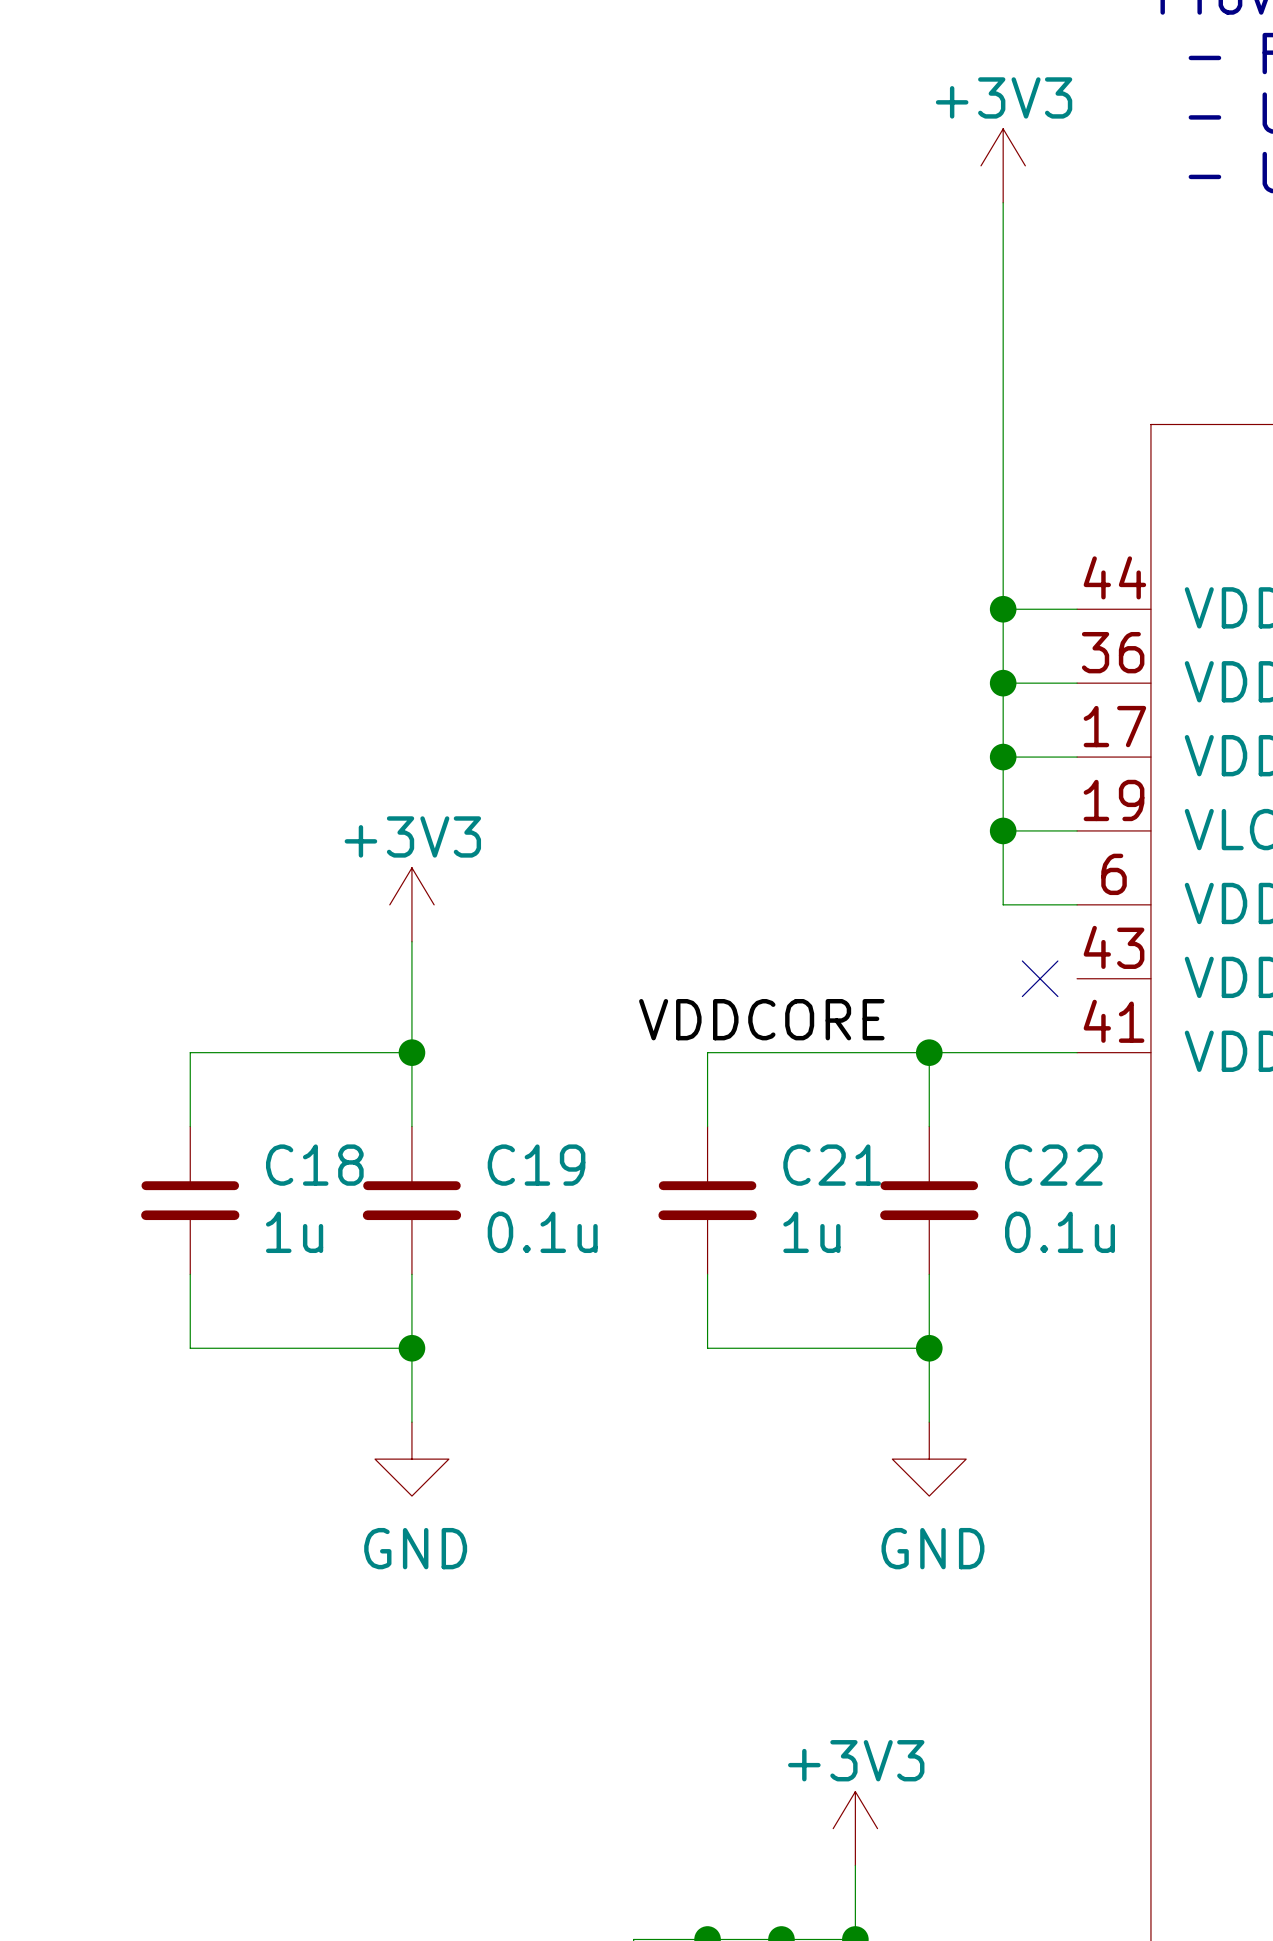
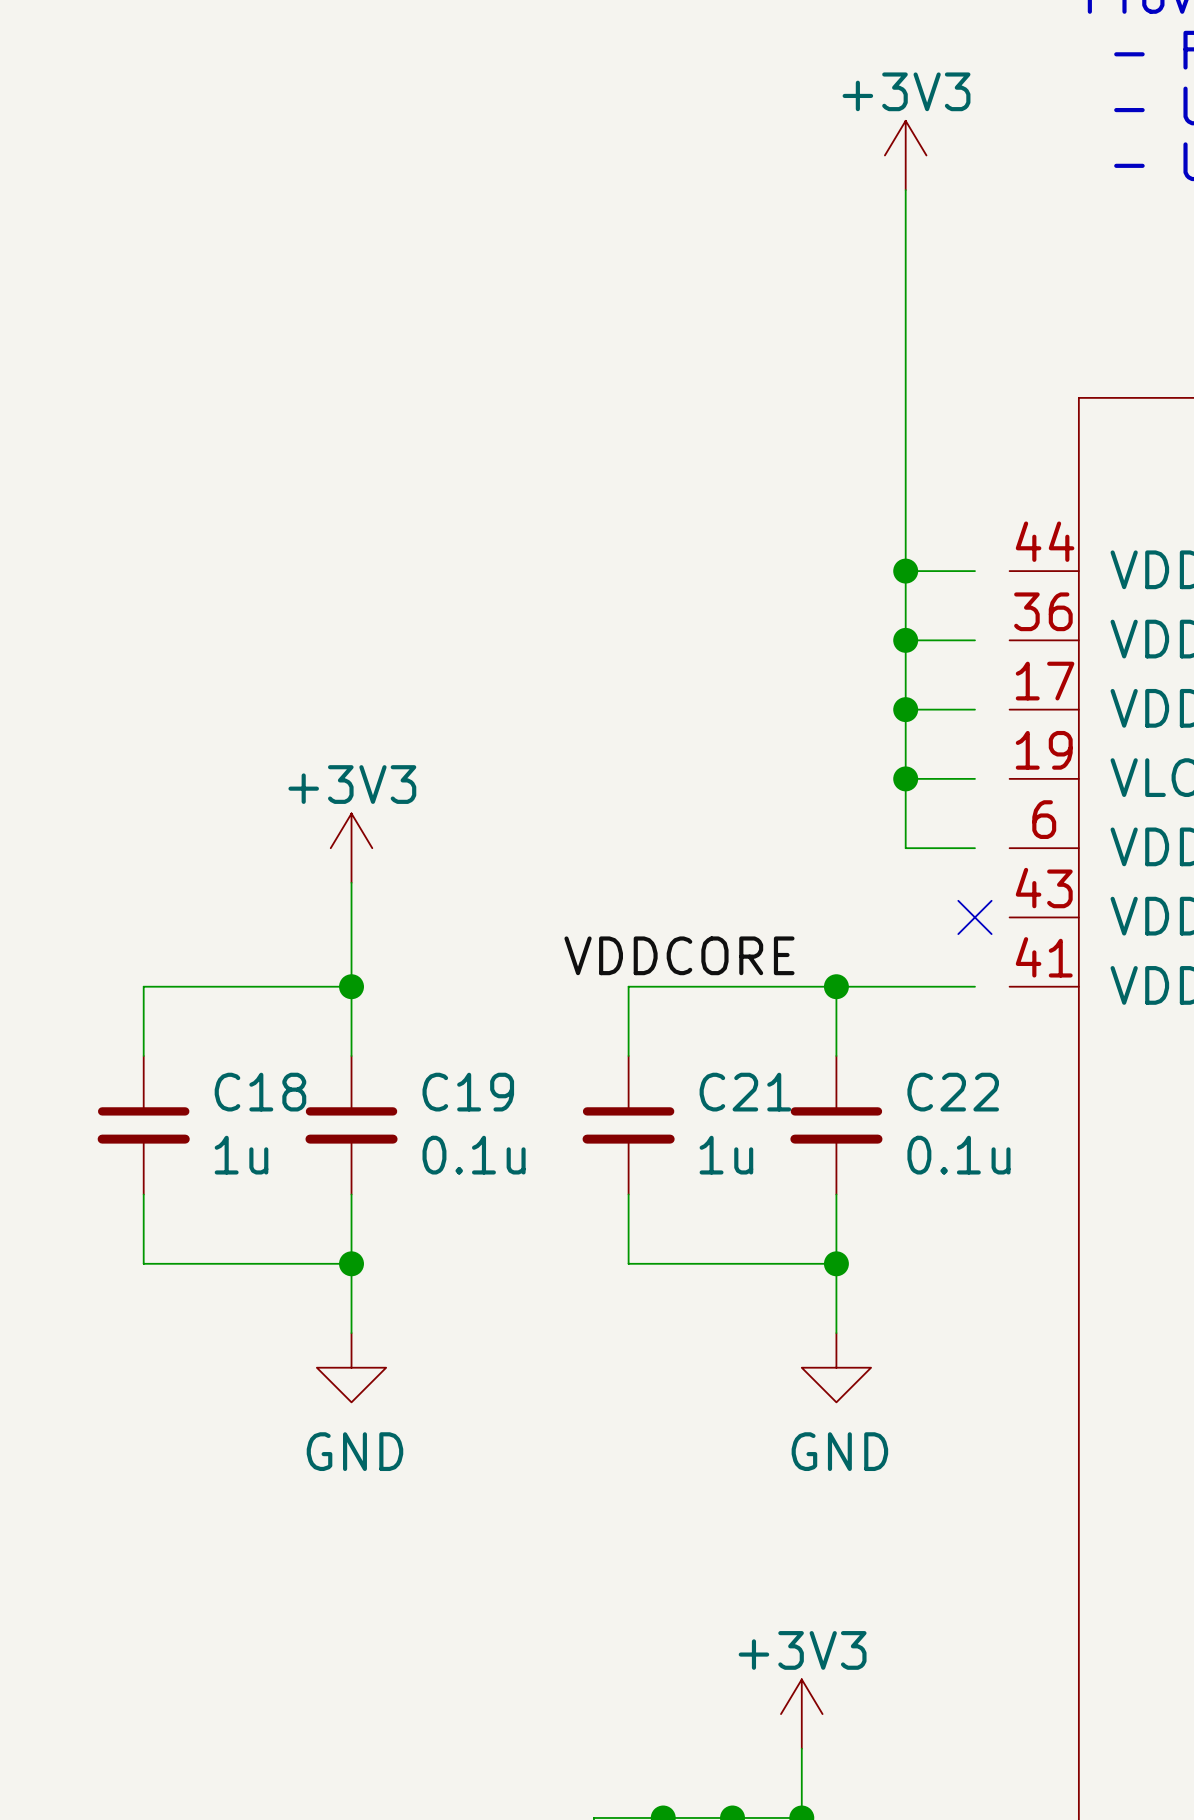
power symbol position: +3V3 (1003, 165) -> +3V3 (905, 155)
wire: (1003, 202) (1003, 904) -> (905, 190) (905, 848) (940, 848)
junction position: (1003, 609) -> (905, 571)
wire: (1040, 609) (1077, 609) -> (905, 571) (940, 571)
junction position: (1003, 683) -> (905, 640)
wire: (1040, 683) (1077, 683) -> (905, 640) (940, 640)
junction position: (1003, 757) -> (905, 709)
wire: (1040, 757) (1077, 757) -> (905, 709) (940, 709)
junction position: (1003, 830) -> (905, 778)
wire: (1040, 830) (1077, 830) -> (905, 778) (940, 778)
power symbol position: +3V3 (411, 904) -> +3V3 (351, 848)
wire: (1040, 904) (1077, 904) -> none
wire: (411, 941) (411, 1126) -> (351, 882) (351, 1055)
label position: VDDCORE (761, 1019) -> VDDCORE (679, 955)
wire: (190, 1052) (190, 1126) -> (178, 986) (143, 986) (143, 1055)
wire: (375, 1052) (411, 1052) -> none
junction position: (411, 1052) -> (351, 986)
wire: (707, 1052) (707, 1126) -> (663, 986) (628, 986) (628, 1055)
wire: (929, 1052) (929, 1126) -> (836, 986) (836, 1055)
junction position: (929, 1052) -> (836, 986)
wire: (1040, 1052) (1077, 1052) -> none
C18 position: (190, 1200) -> (143, 1125)
C19 position: (411, 1200) -> (351, 1125)
C21 position: (707, 1200) -> (628, 1125)
C22 position: (929, 1200) -> (836, 1125)
wire: (190, 1274) (190, 1348) -> (143, 1194) (143, 1263) (178, 1263)
wire: (411, 1274) (411, 1422) -> (351, 1194) (351, 1333)
wire: (707, 1274) (707, 1348) -> (628, 1194) (628, 1263) (663, 1263)
wire: (929, 1274) (929, 1422) -> (836, 1194) (836, 1333)
wire: (375, 1348) (411, 1348) -> none
junction position: (411, 1348) -> (351, 1263)
wire: (892, 1348) (929, 1348) -> none
junction position: (929, 1348) -> (836, 1263)
power symbol position: GND (411, 1459) -> GND (351, 1367)
power symbol position: GND (929, 1459) -> GND (836, 1367)

